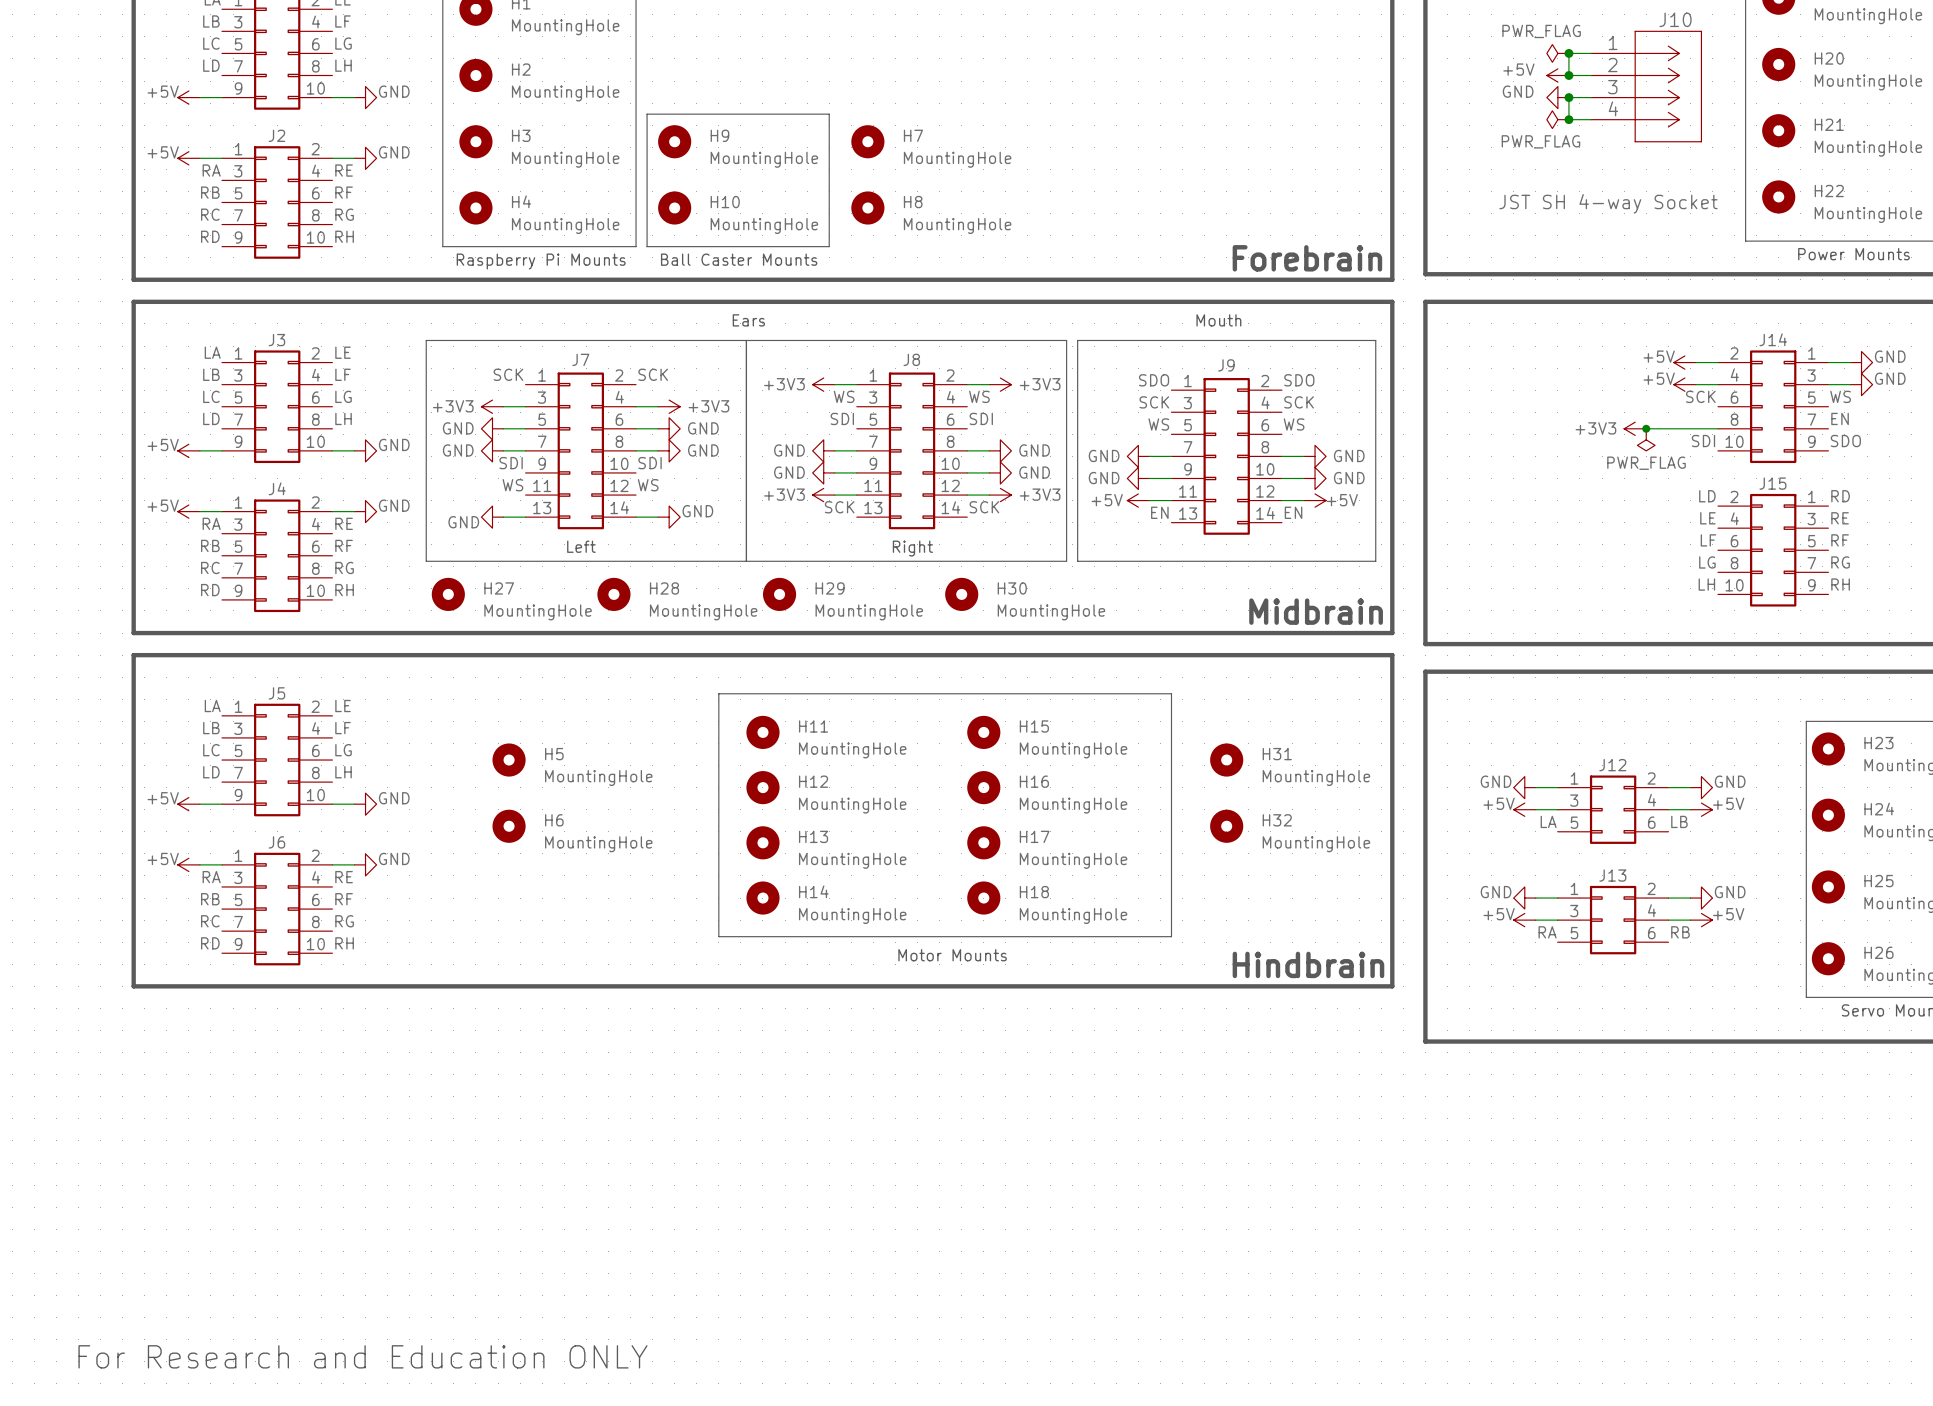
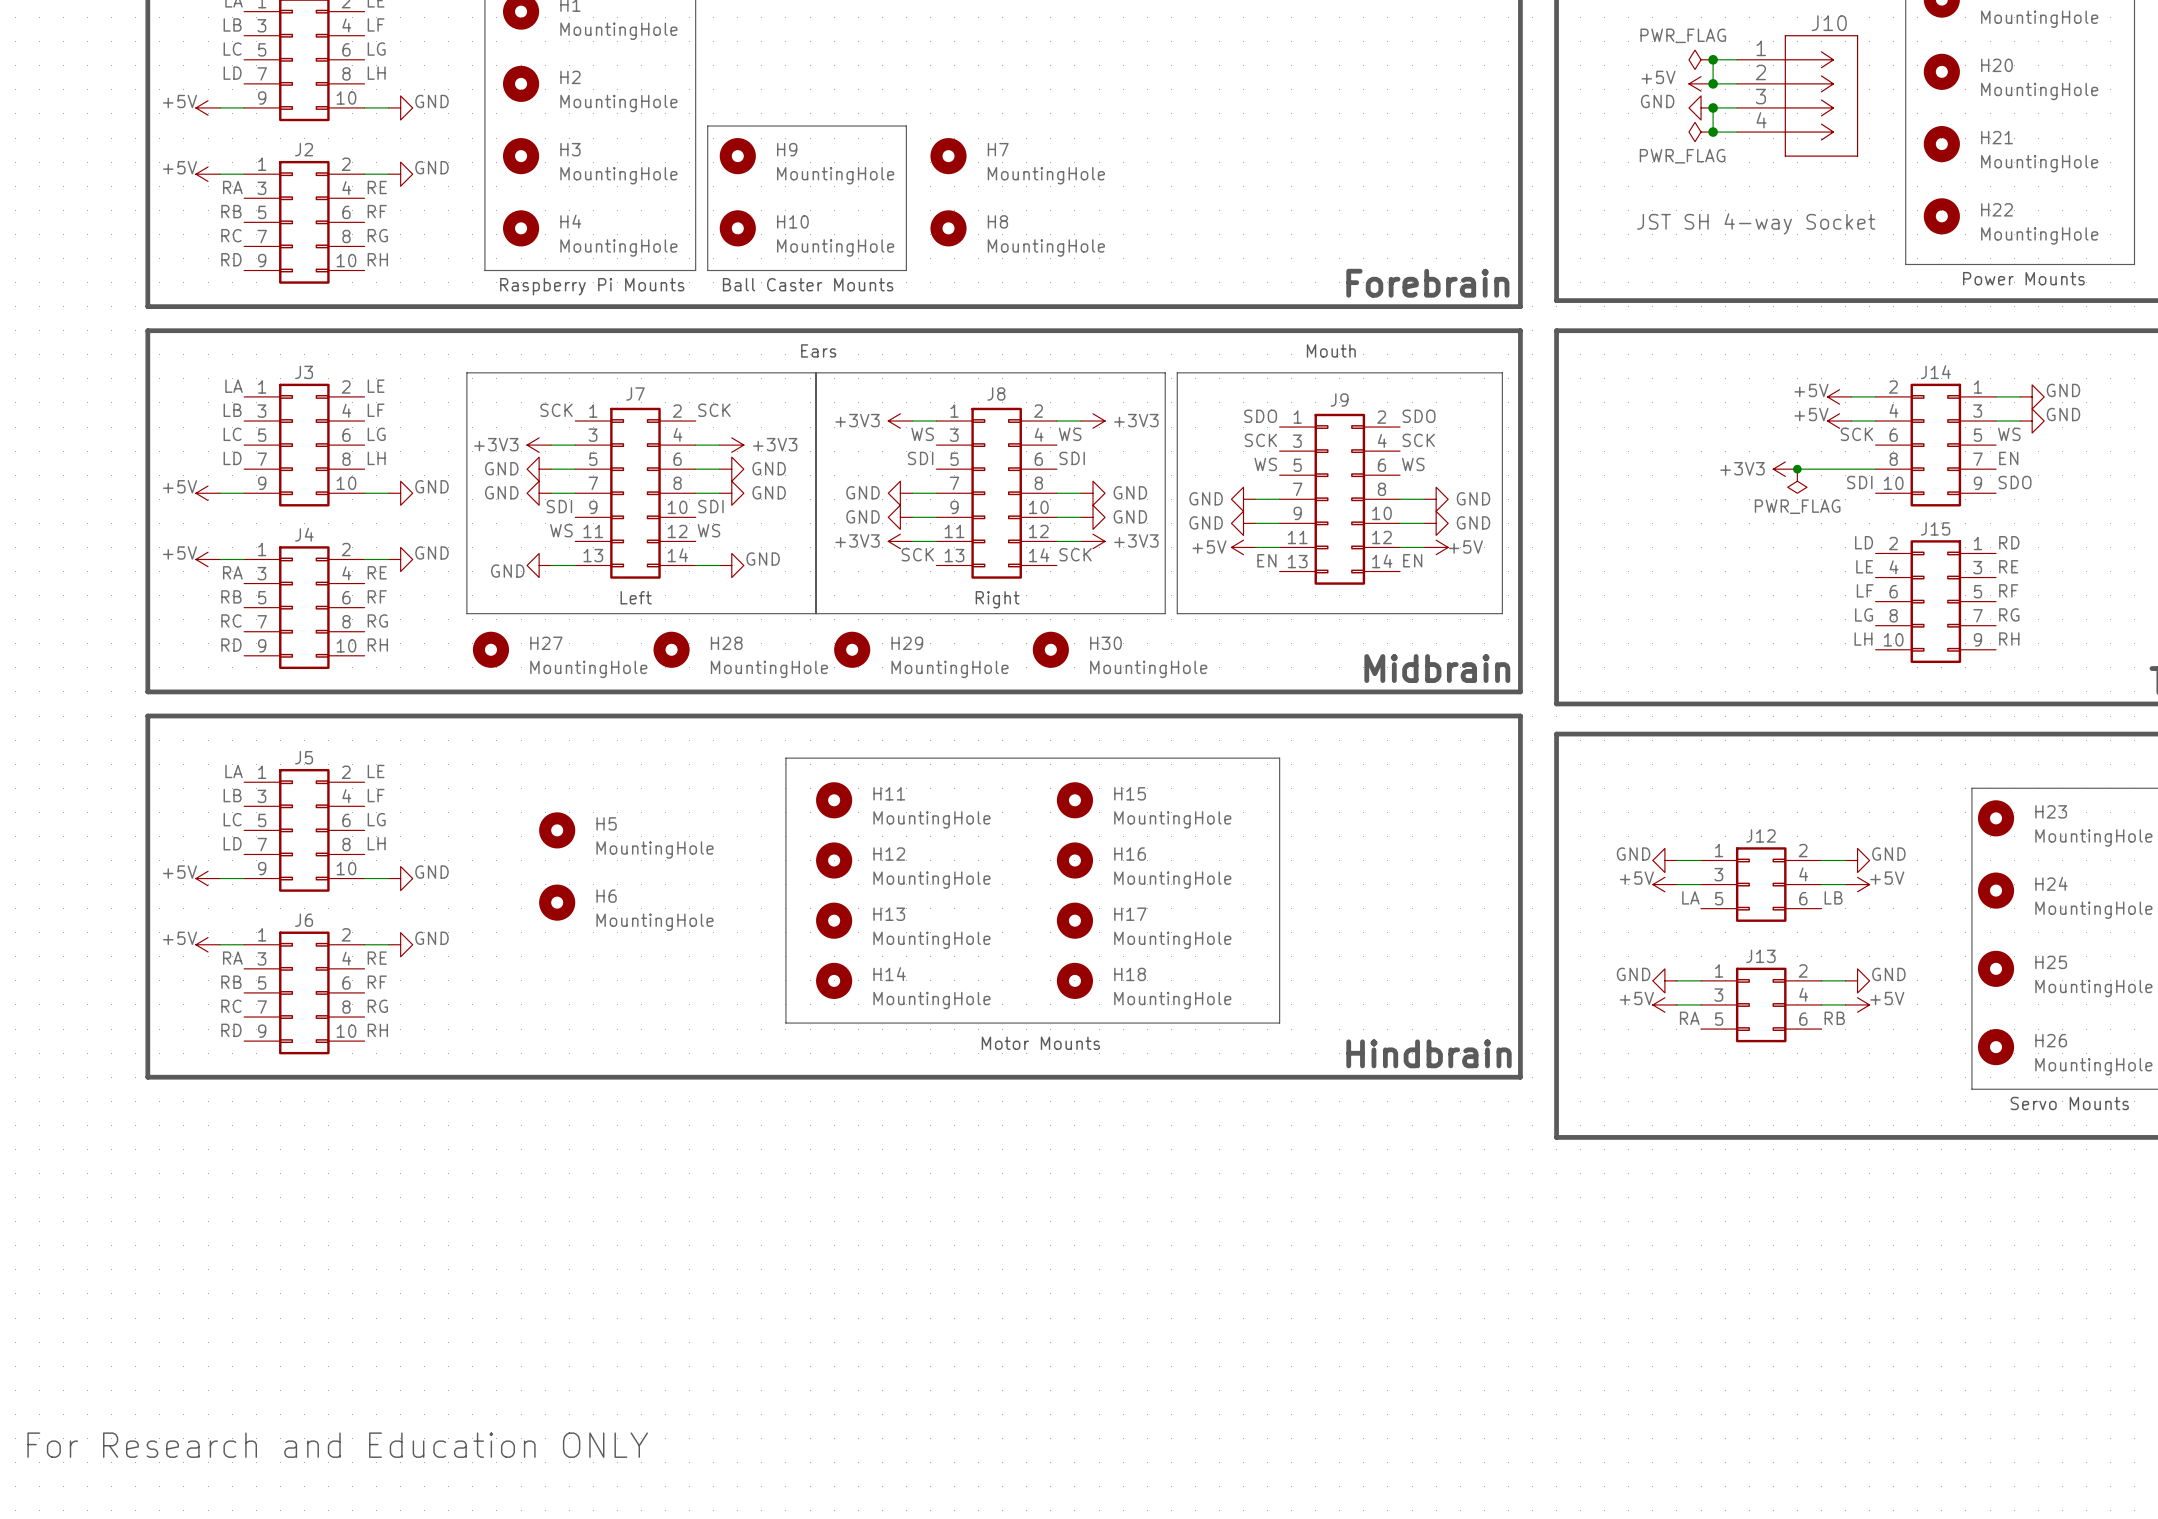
H31: MountingHole (1226, 760) -> none
H32: MountingHole (1226, 826) -> none
text position: For Research and Education ONLY (362, 1356) -> For Research and Education ONLY (337, 1445)

